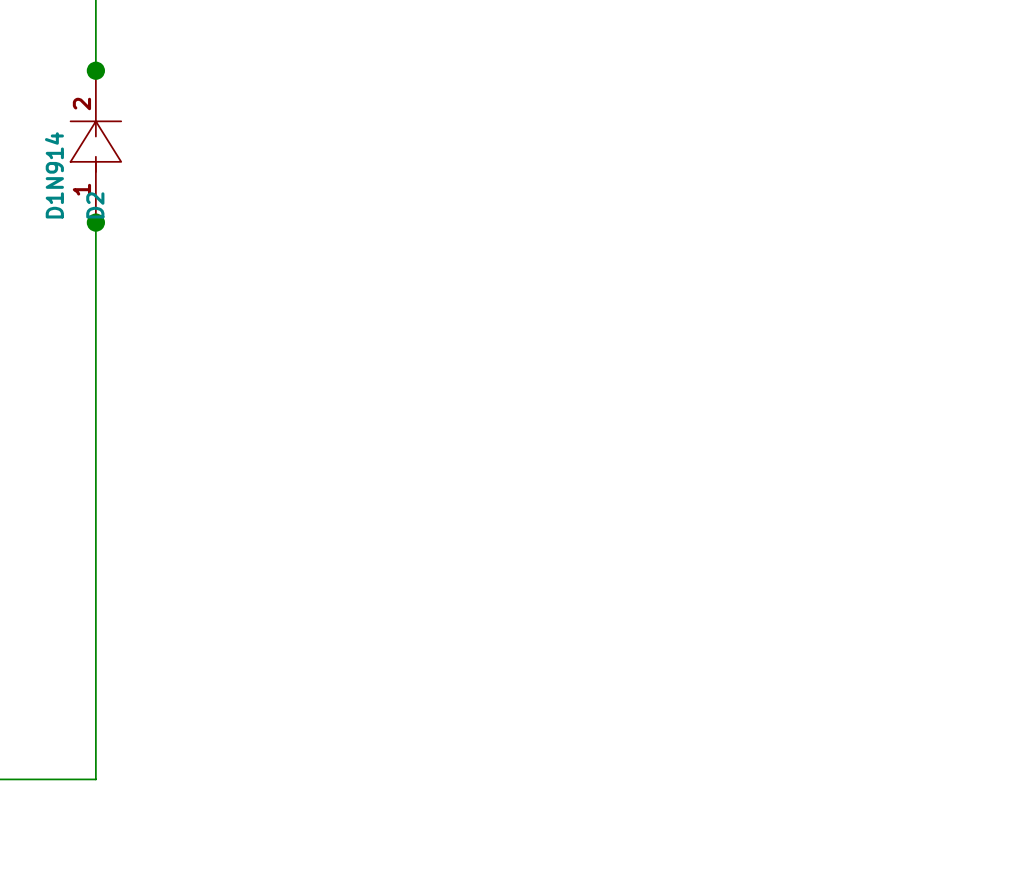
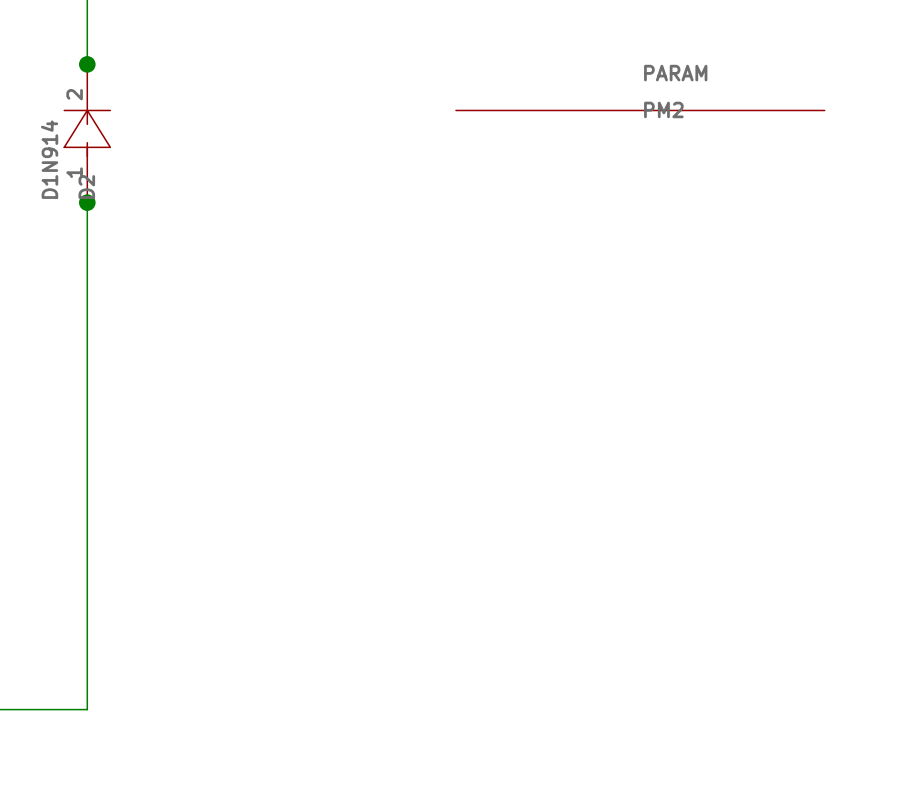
PM2: none -> PARAM (640, 110)

